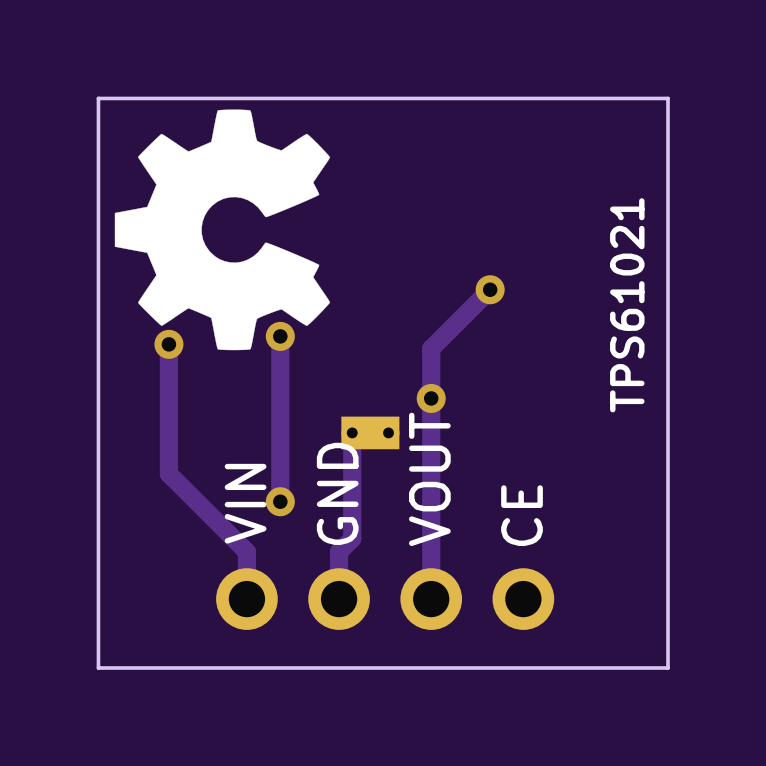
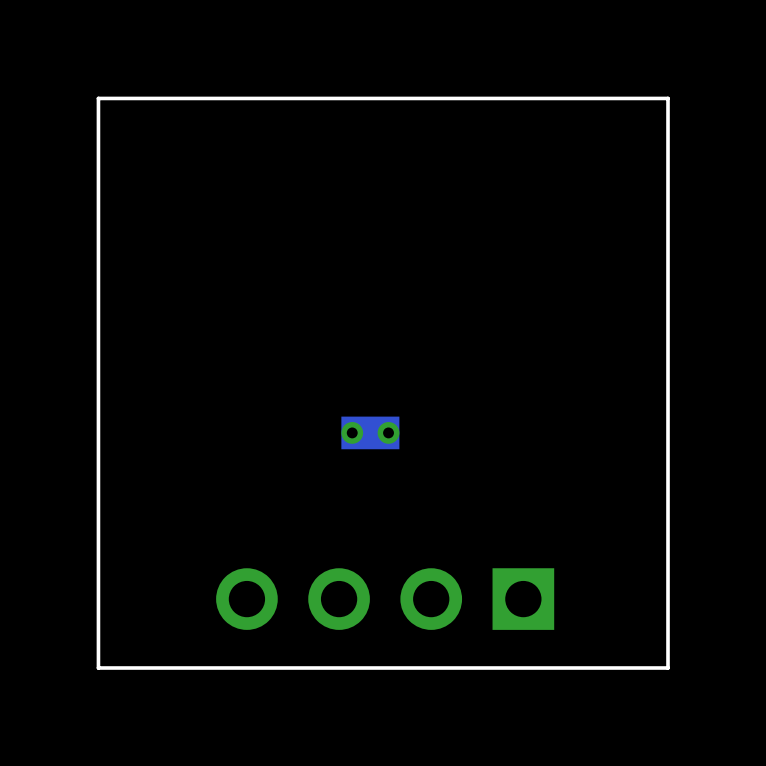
drawing: [114, 109, 331, 351] -> none
track: (490, 289) (431, 348) (431, 599) -> none
via: (490, 289) -> none
text: TPS61021 (627, 305) -> none
track: (280, 336) (280, 501) -> none
via: (280, 336) -> none
track: (168, 344) (168, 473) (246, 551) (246, 599) -> none
via: (168, 344) -> none
via: (431, 398) -> none
track: (370, 432) (352, 432) (352, 538) (339, 551) (339, 599) -> none
text: VOUT (429, 479) -> none
text: GND (337, 493) -> none
via: (280, 501) -> none
text: VIN (245, 503) -> none
text: CE (522, 515) -> none
part footprint: [216, 568, 555, 630] -> [216, 568, 555, 630]

